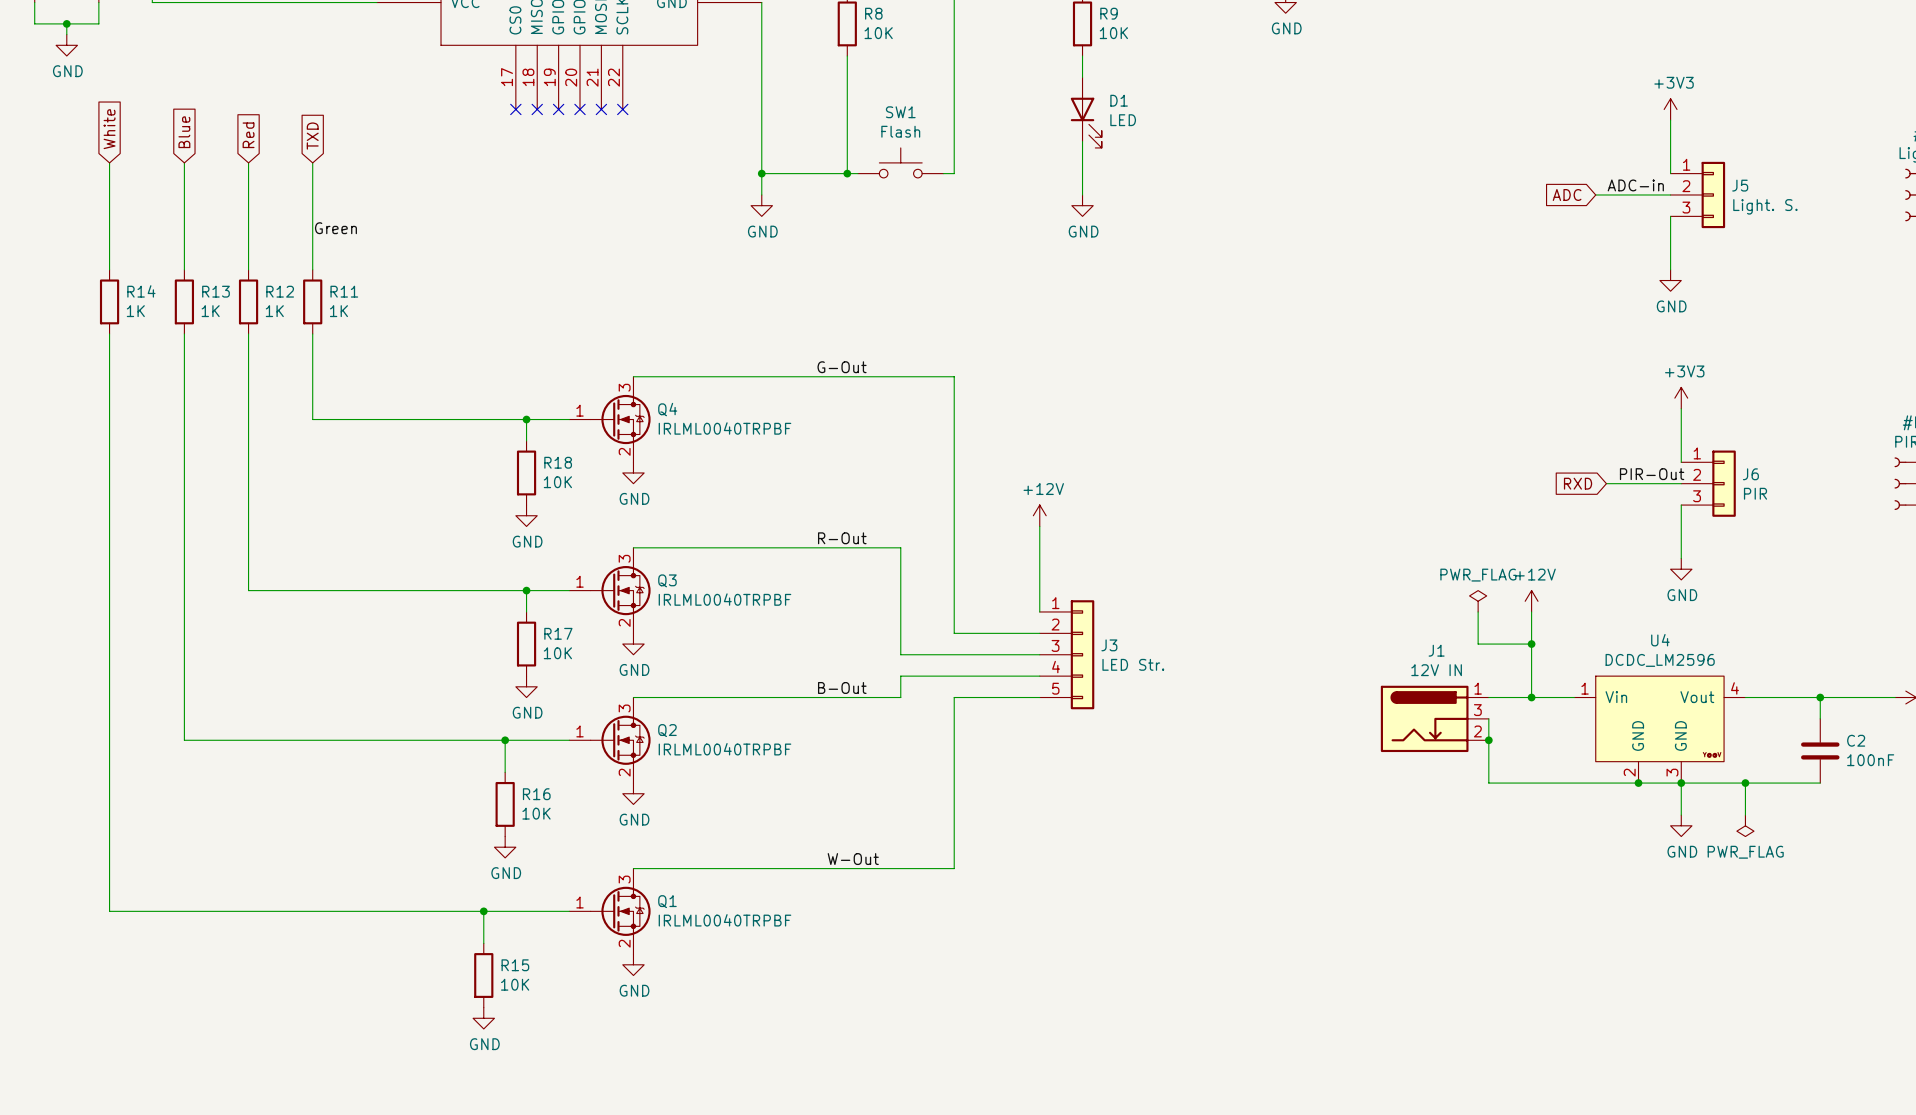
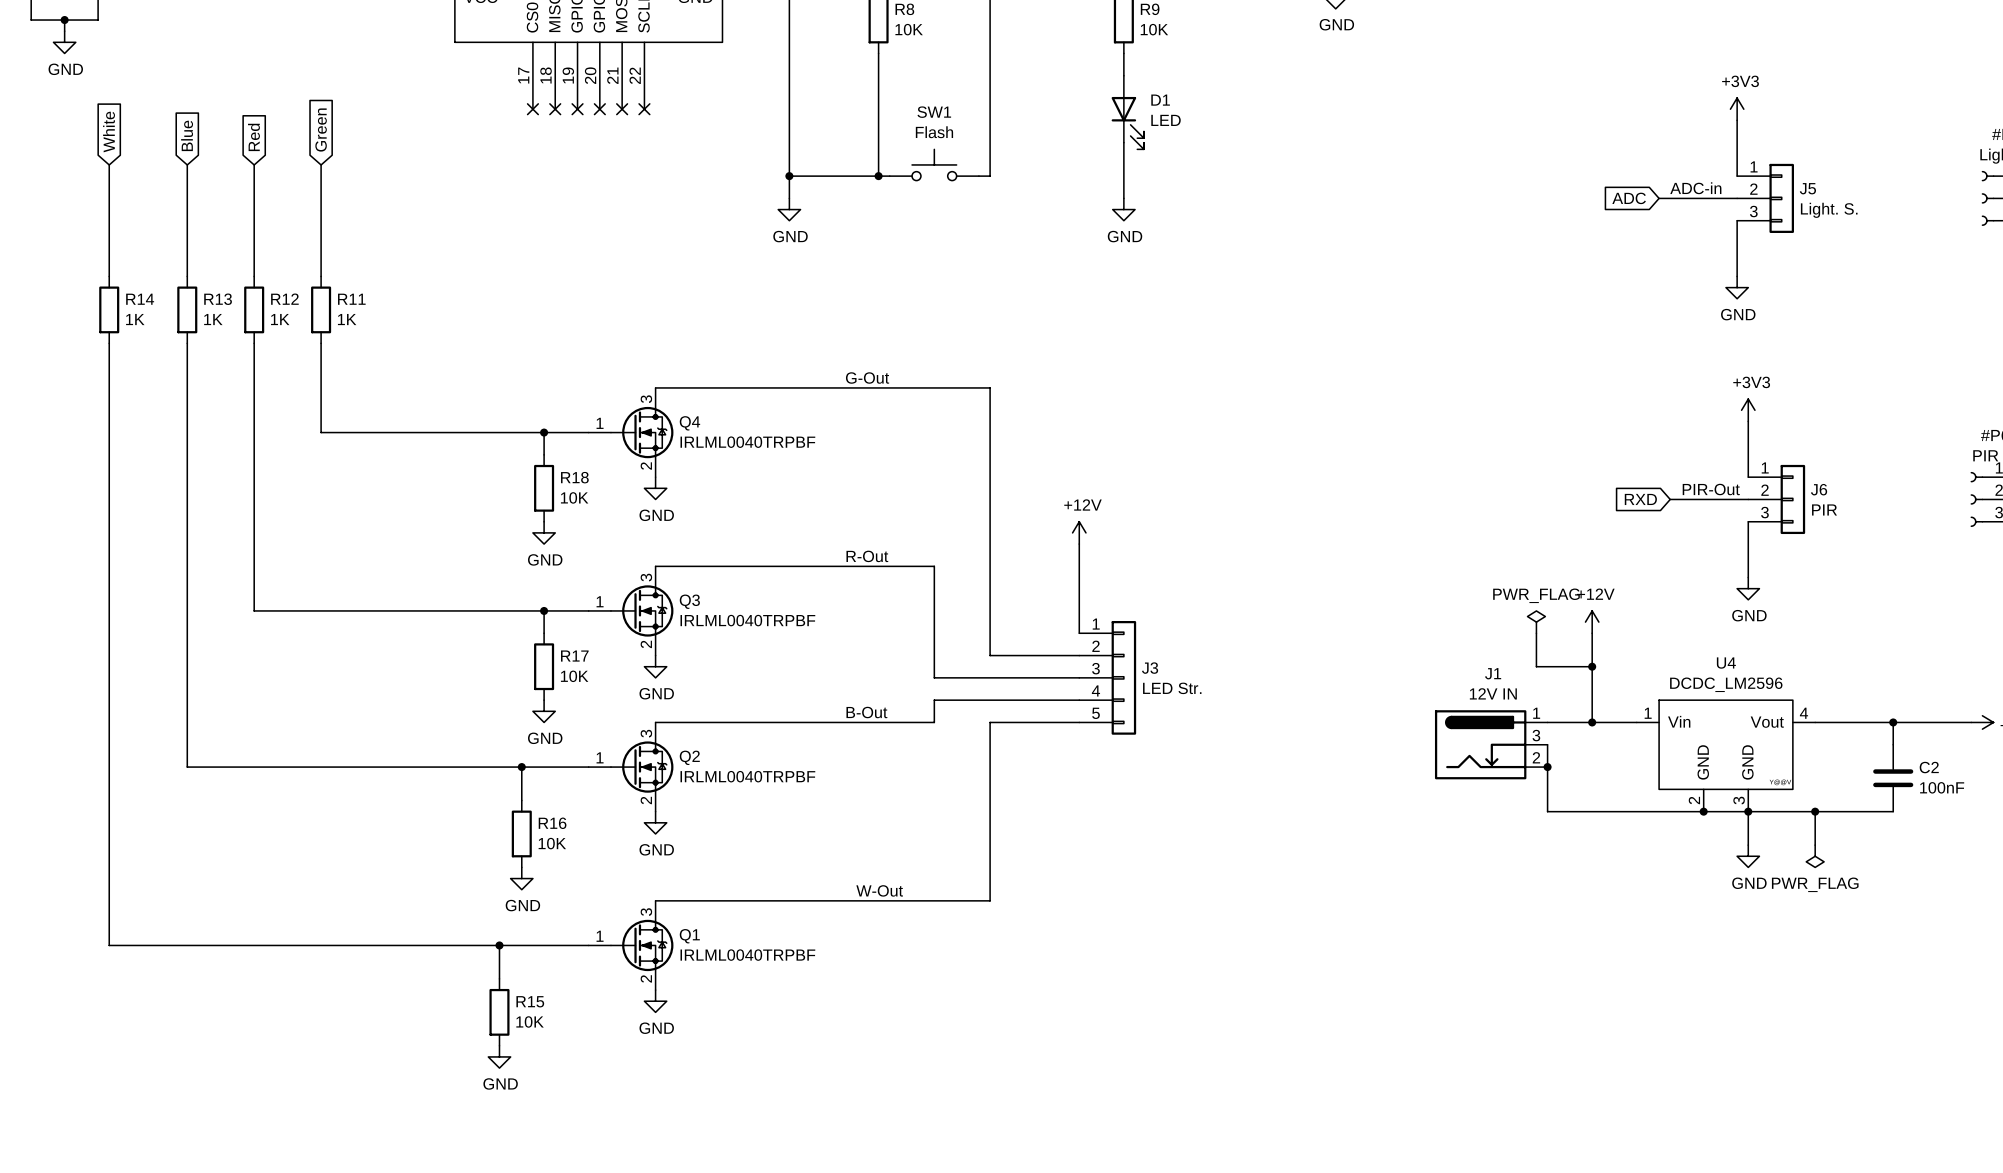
global label: TXD (312, 136) -> Green (321, 130)
label: Green (335, 228) -> none

